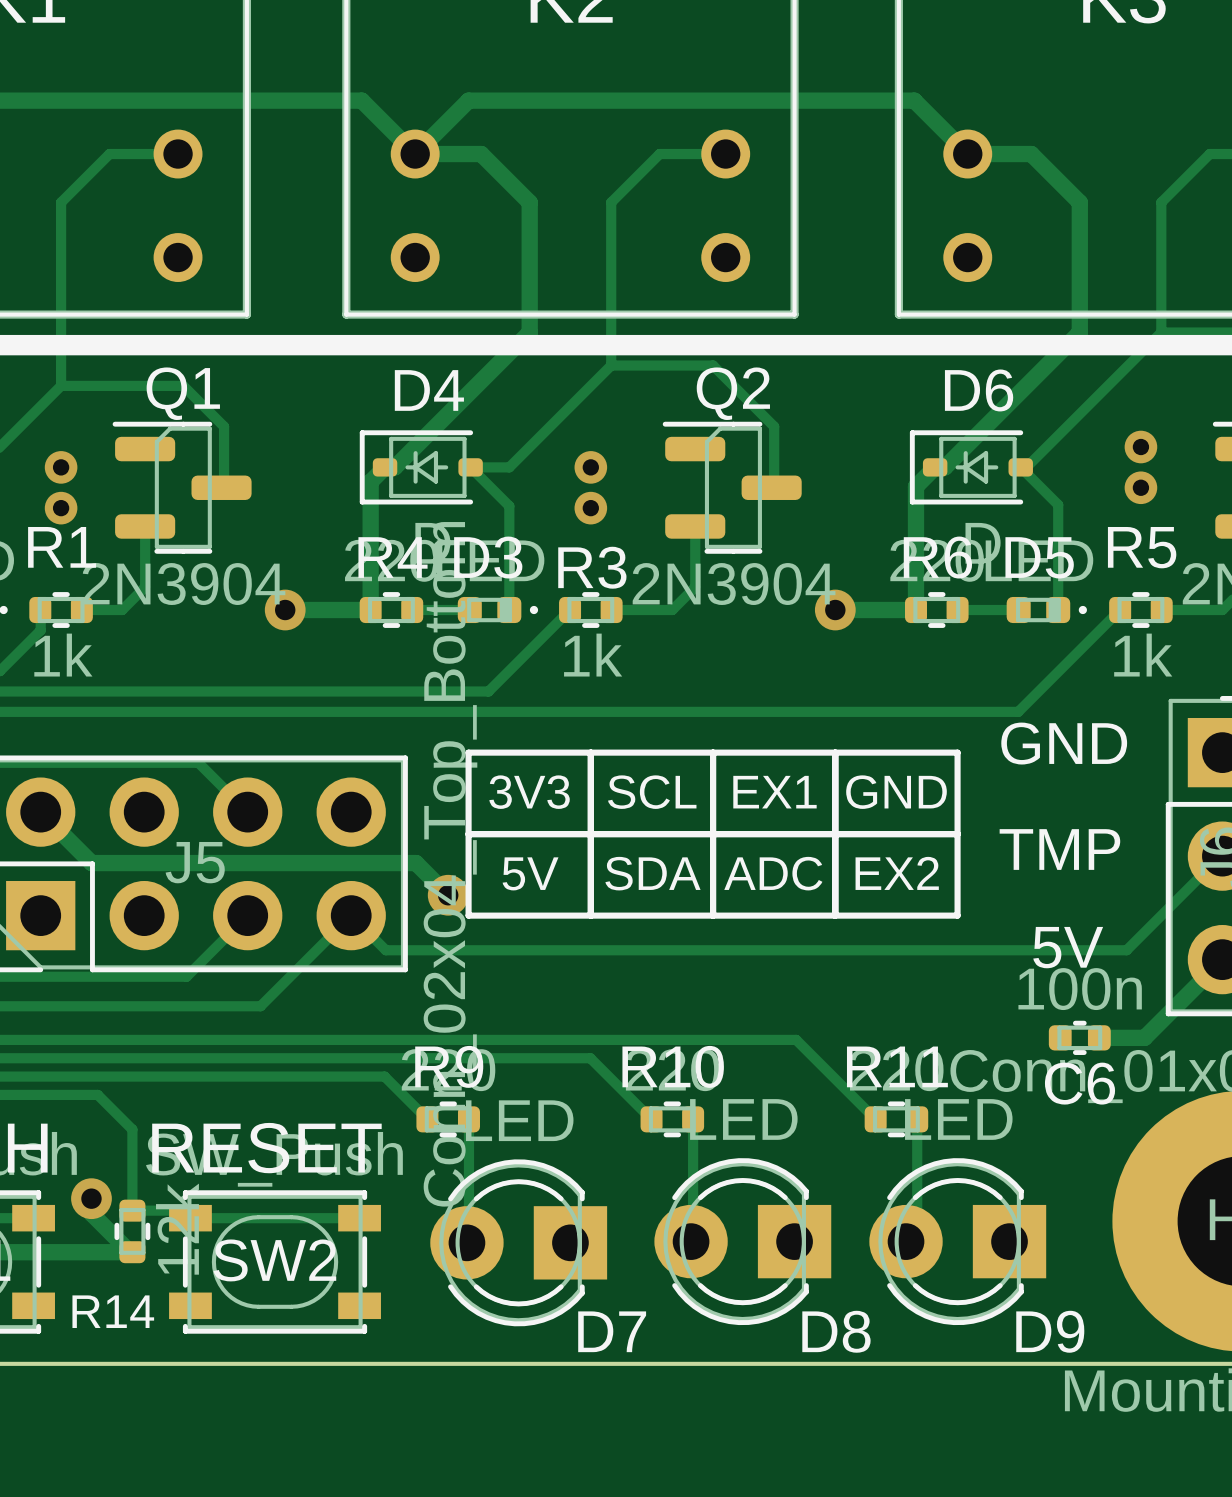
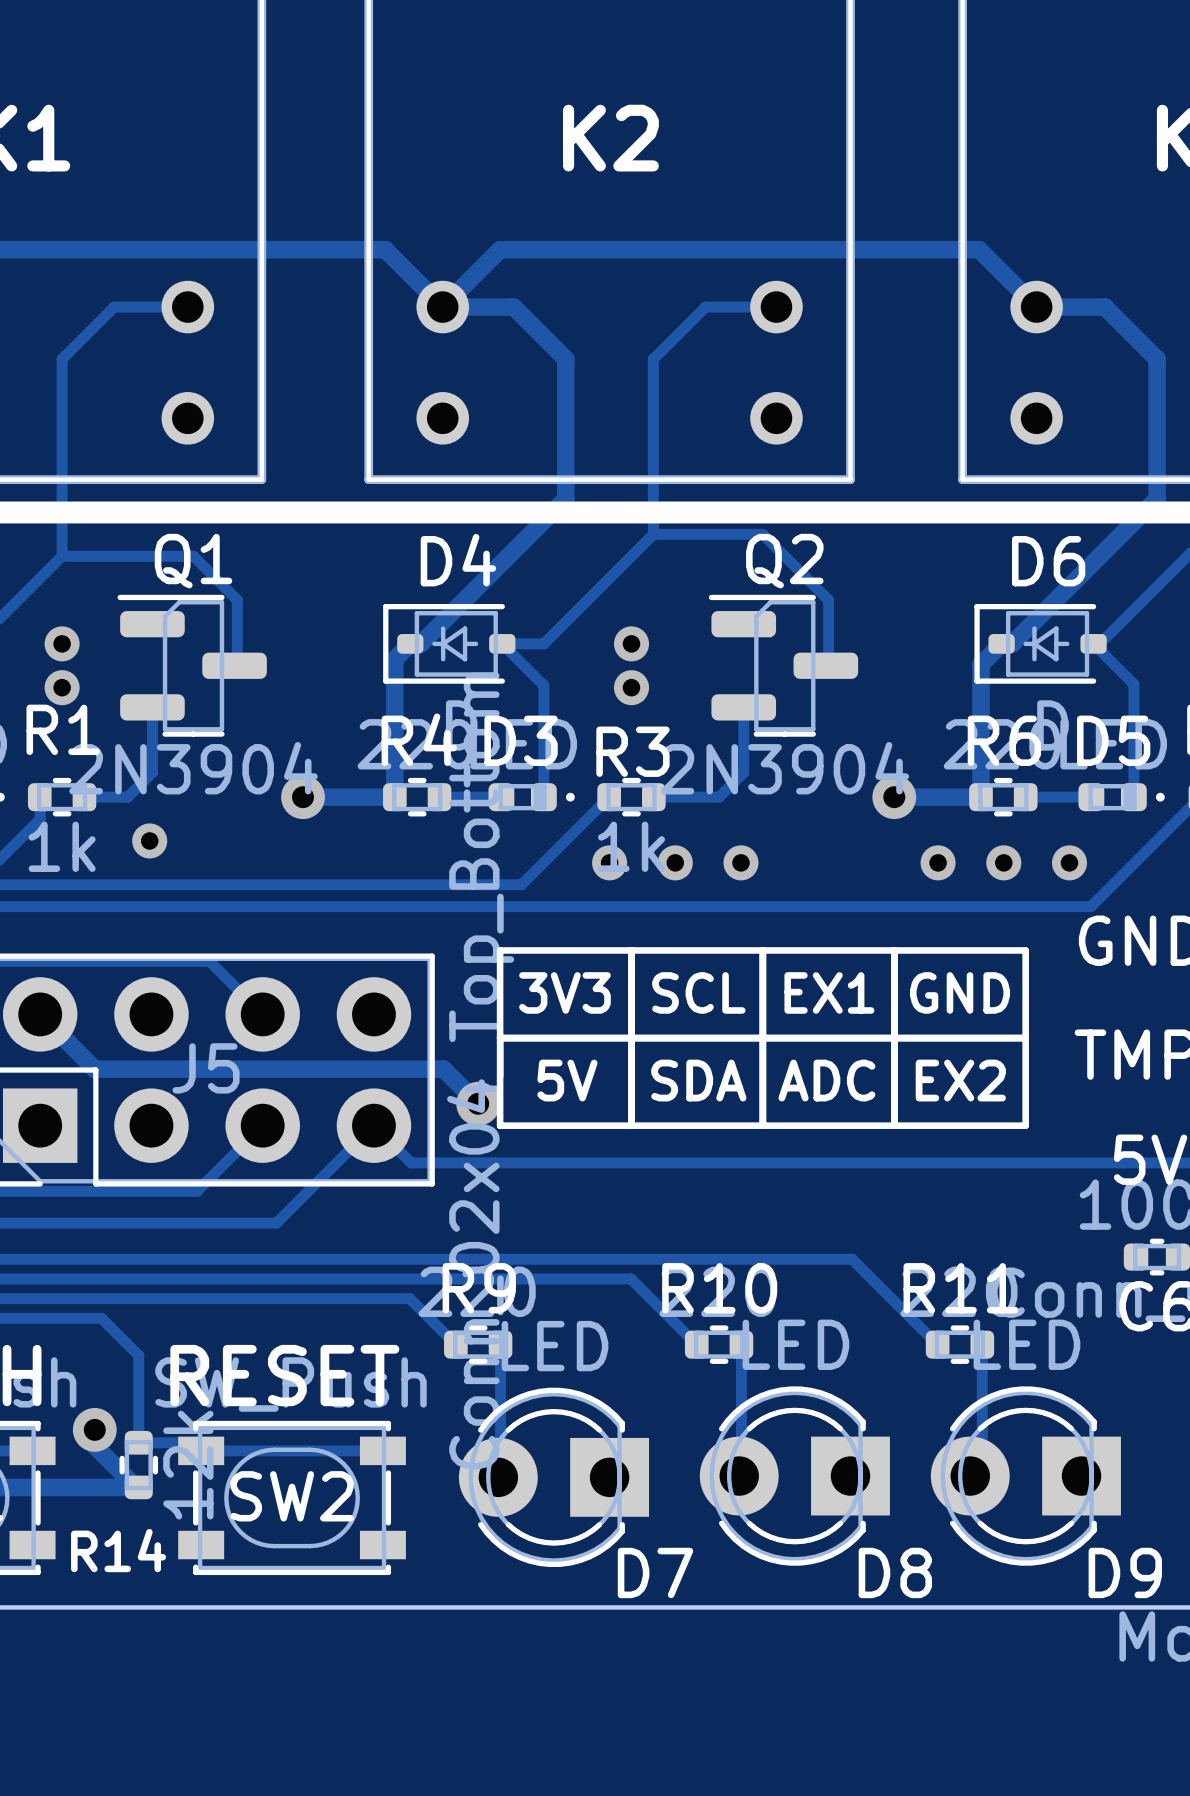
via: none -> (149, 840)
via: none -> (609, 862)
via: none -> (675, 862)
via: none -> (740, 862)
via: none -> (938, 862)
via: none -> (1003, 862)
via: none -> (1069, 862)

